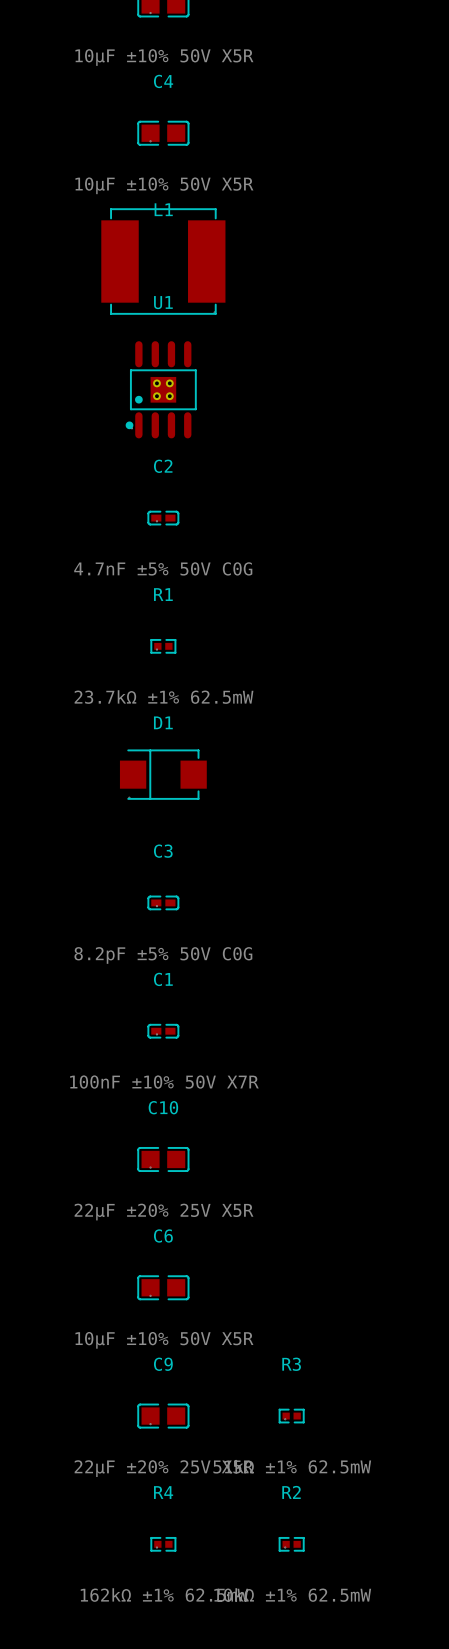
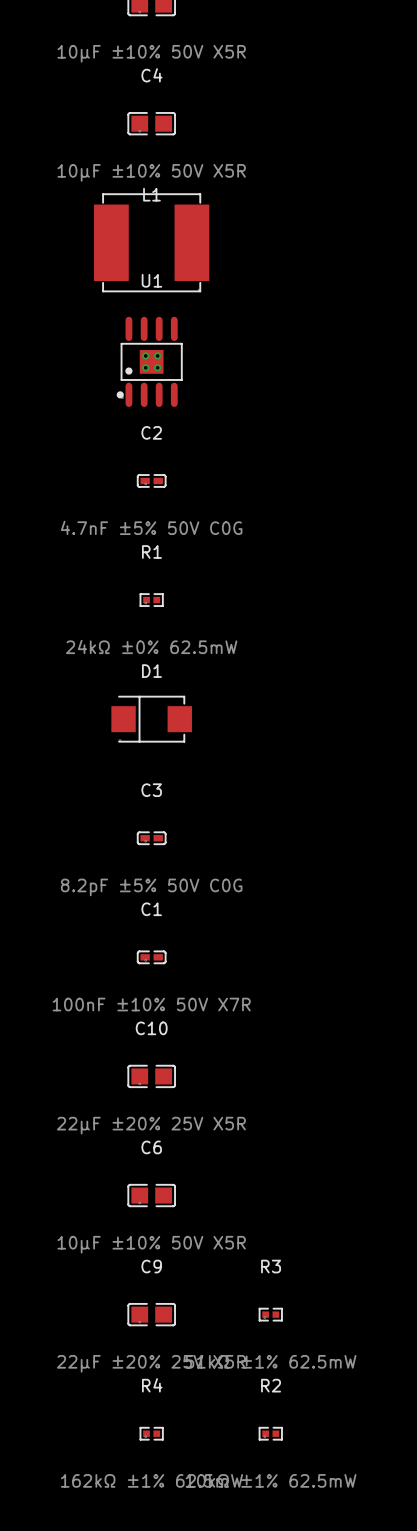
R1 value: 23.7kΩ ±1% 62.5mW (164, 697) -> 24kΩ ±0% 62.5mW (151, 646)

